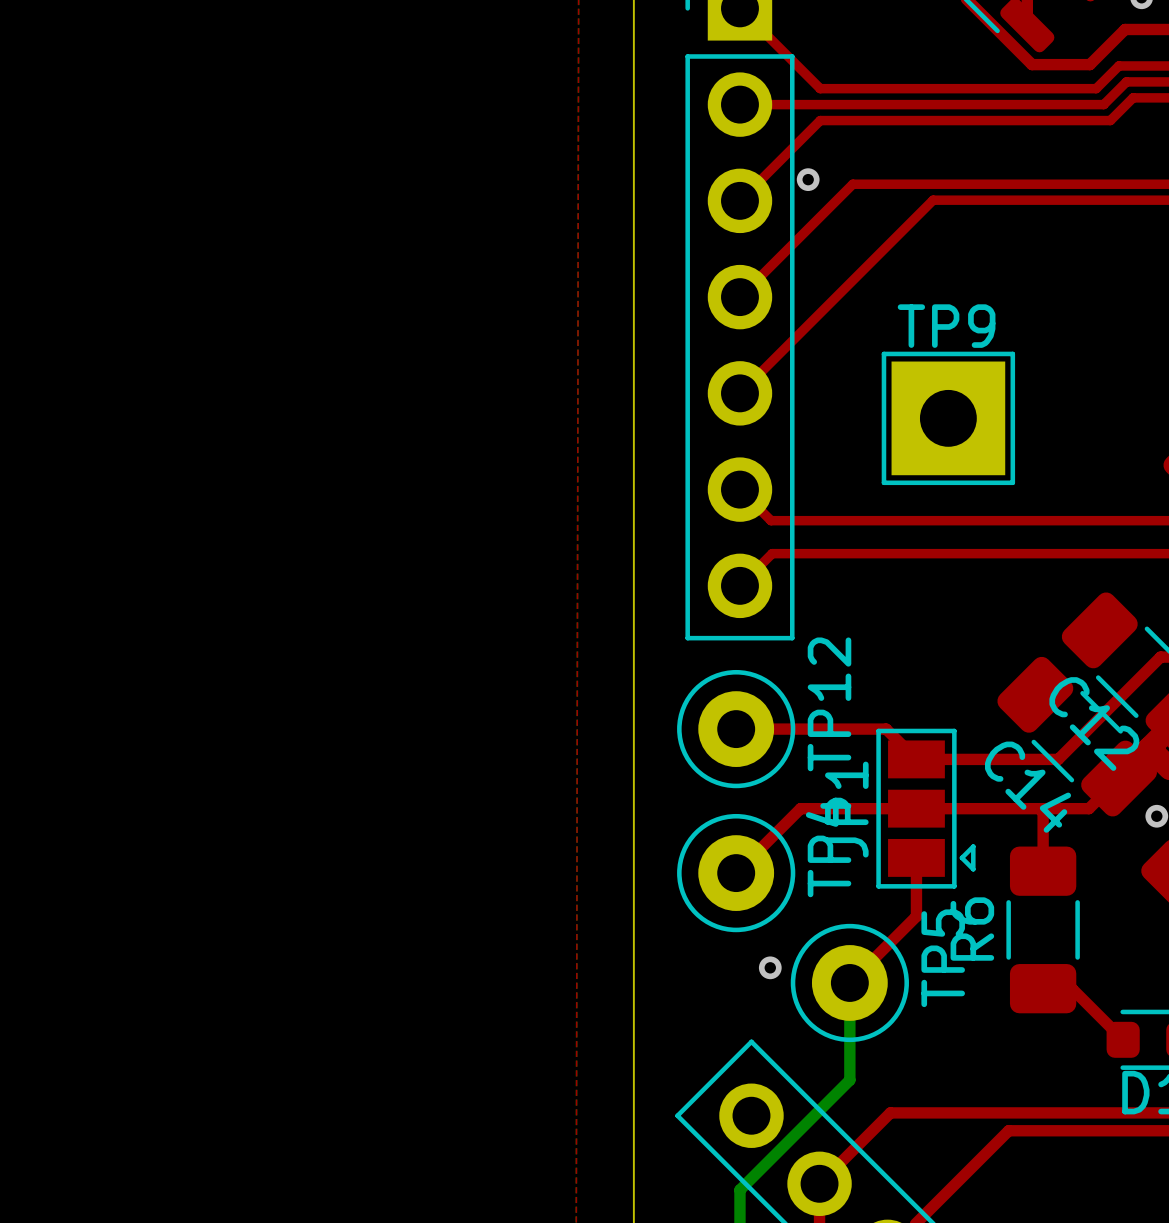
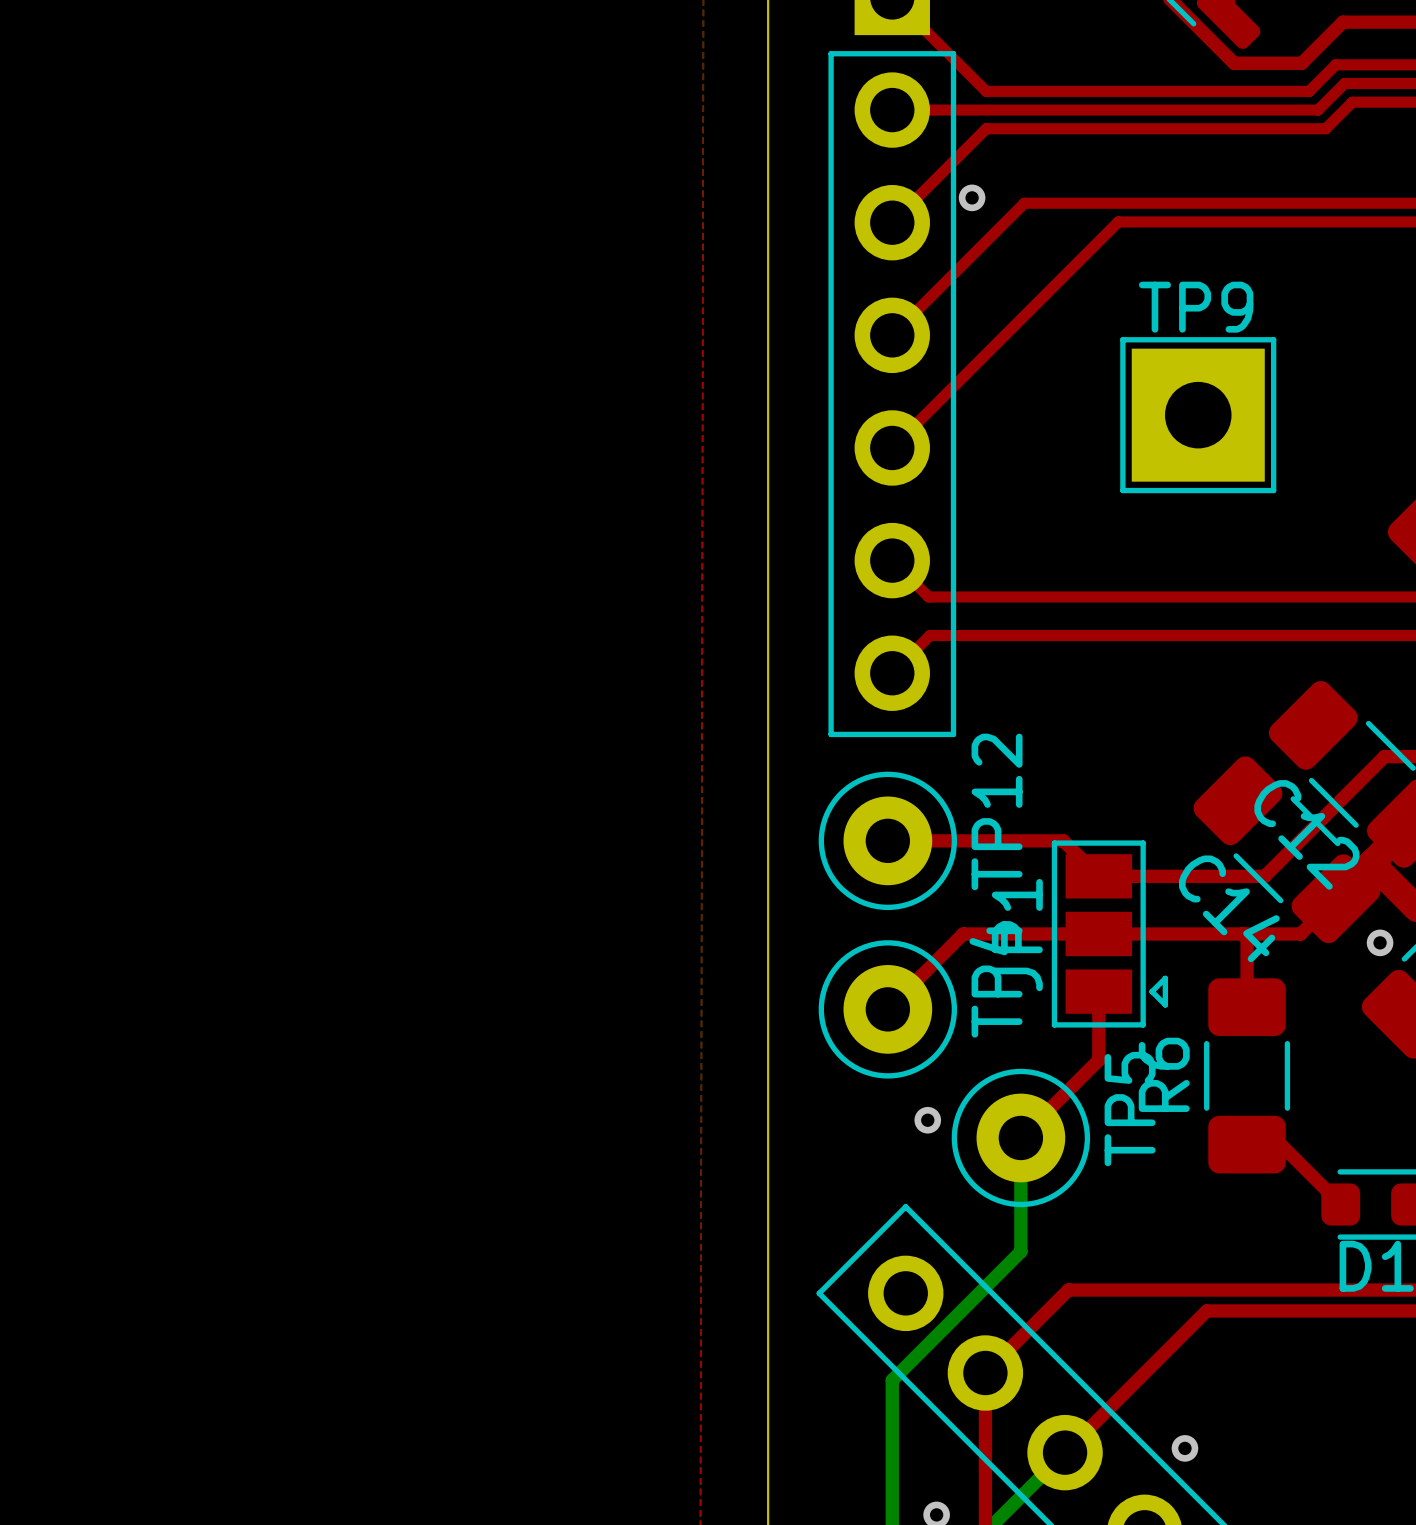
TP9 position: (948, 418) -> (1198, 415)

